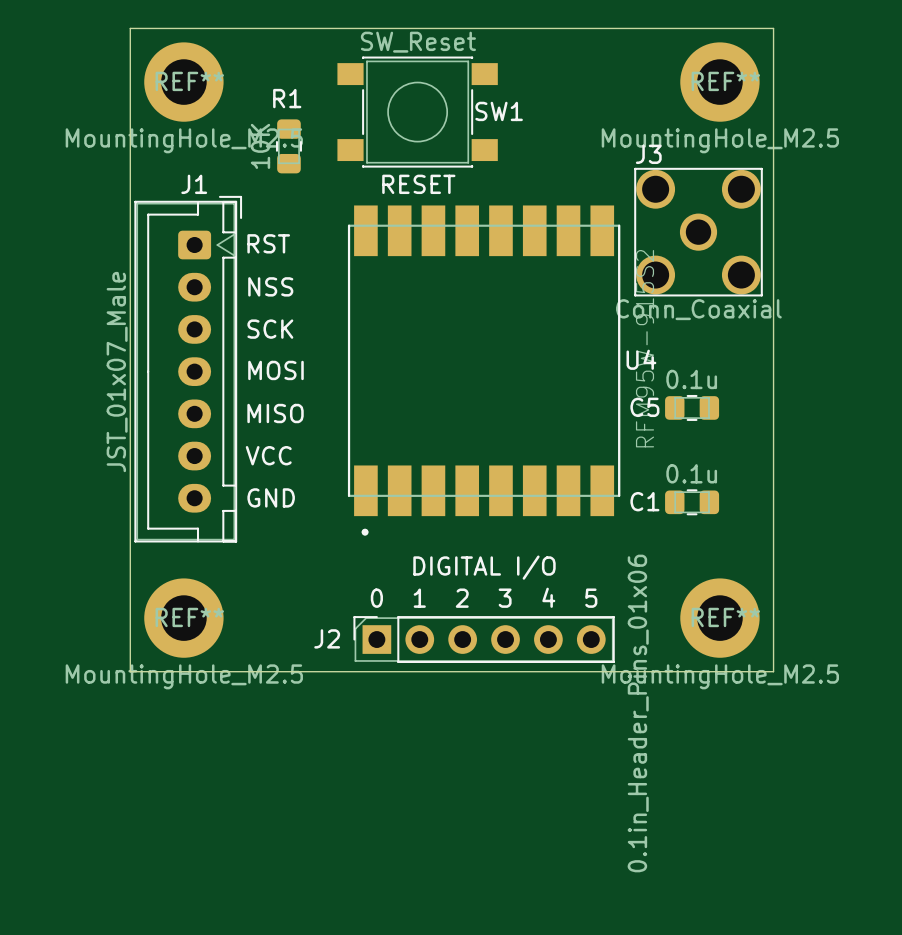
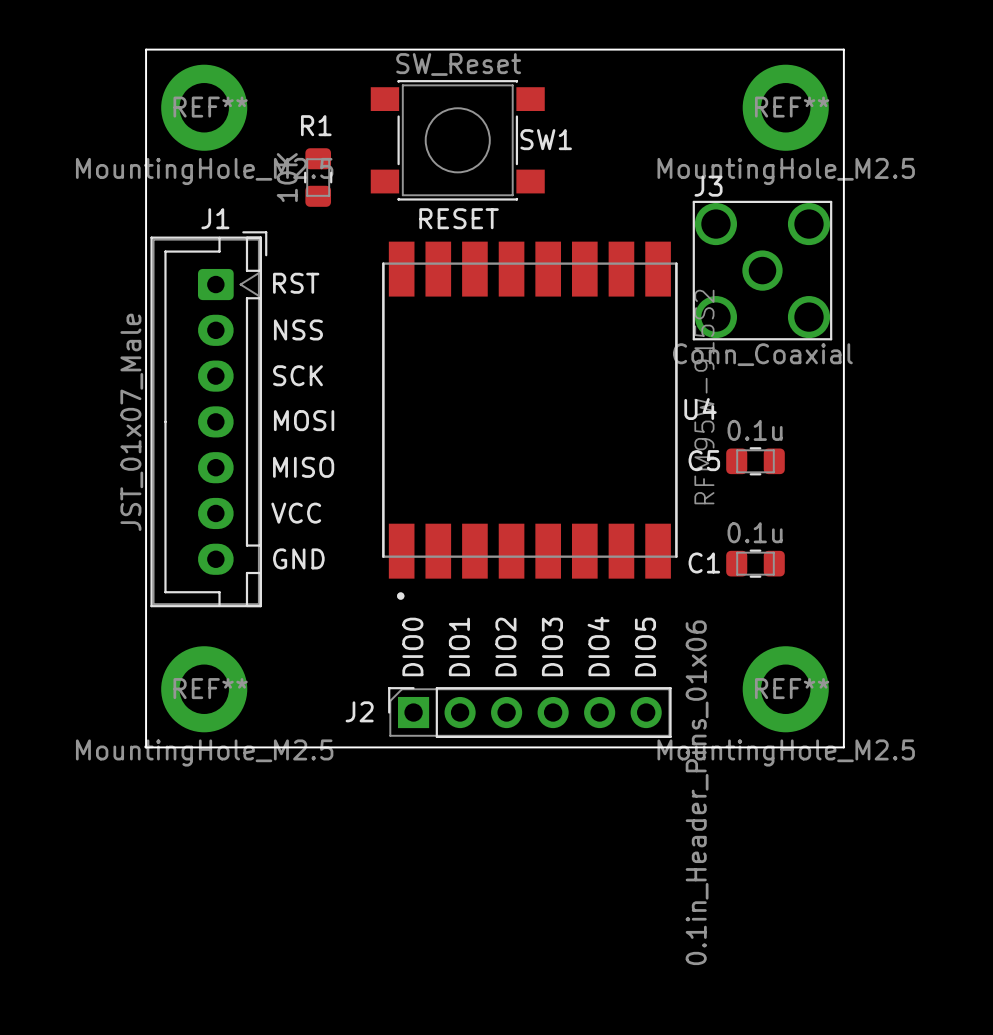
text: DIGITAL I/O (484, 567) -> none
text: none -> DIO4 (598, 646)
text: none -> DIO0 (412, 646)
text: none -> DIO1 (459, 646)
text: none -> DIO2 (505, 646)
text: none -> DIO3 (552, 646)
text: none -> DIO5 (645, 646)
text: 4 (548, 597) -> none
text: 0 (376, 598) -> none
text: 1 (419, 598) -> none
text: 2 (462, 598) -> none
text: 3 (505, 598) -> none
text: 5 (591, 598) -> none

